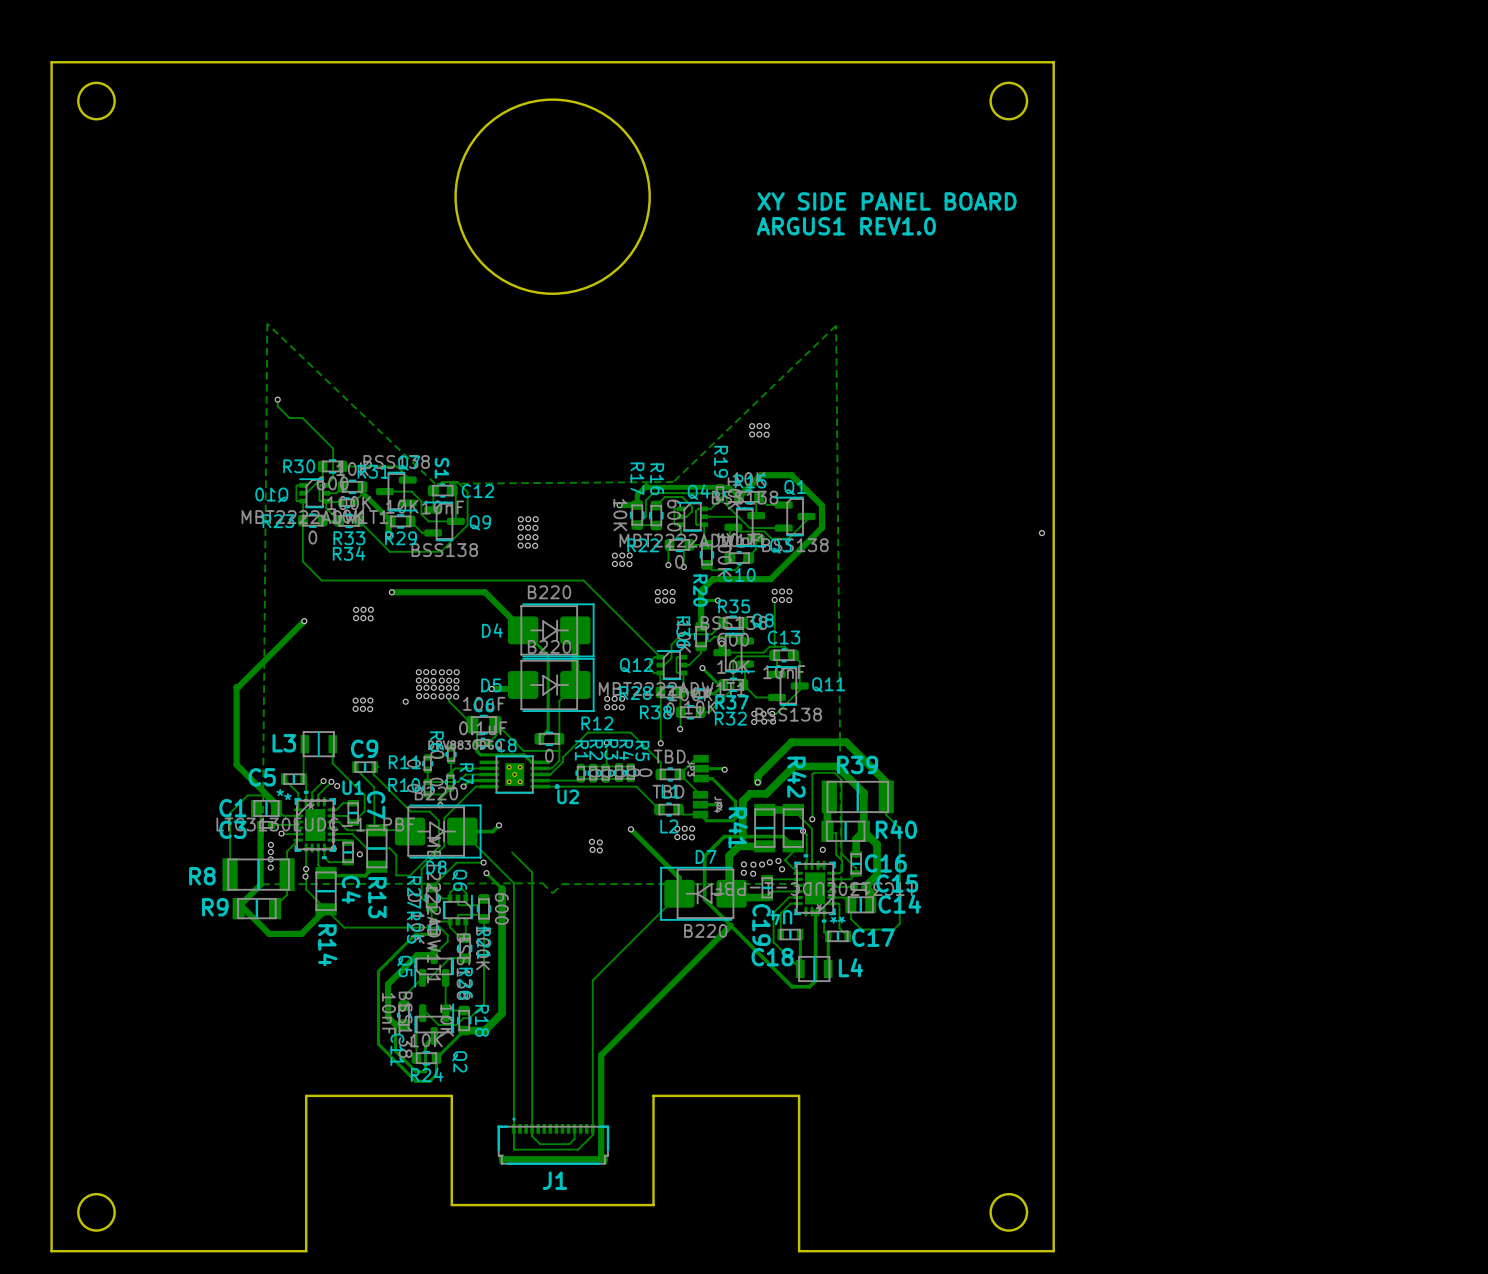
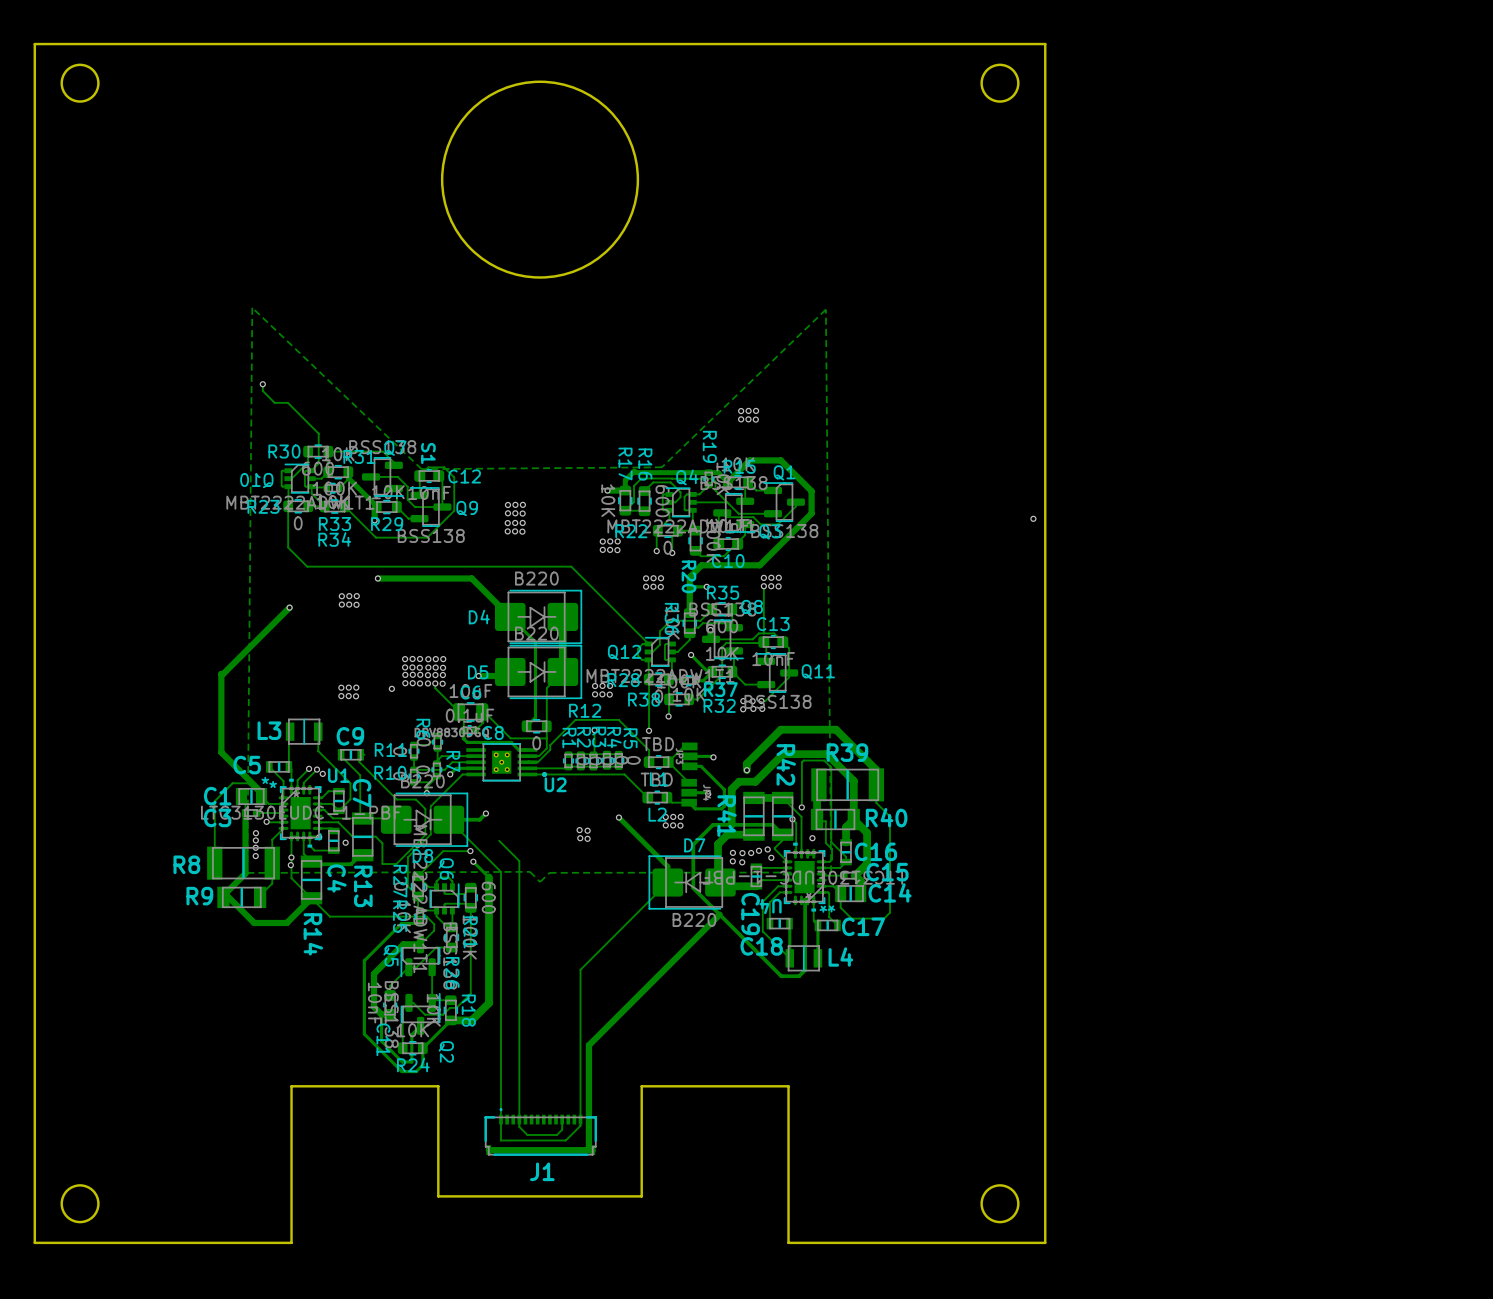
text: XY SIDE PANEL BOARD (887, 201) -> none
text: ARGUS1 REV1.0 (846, 226) -> none

